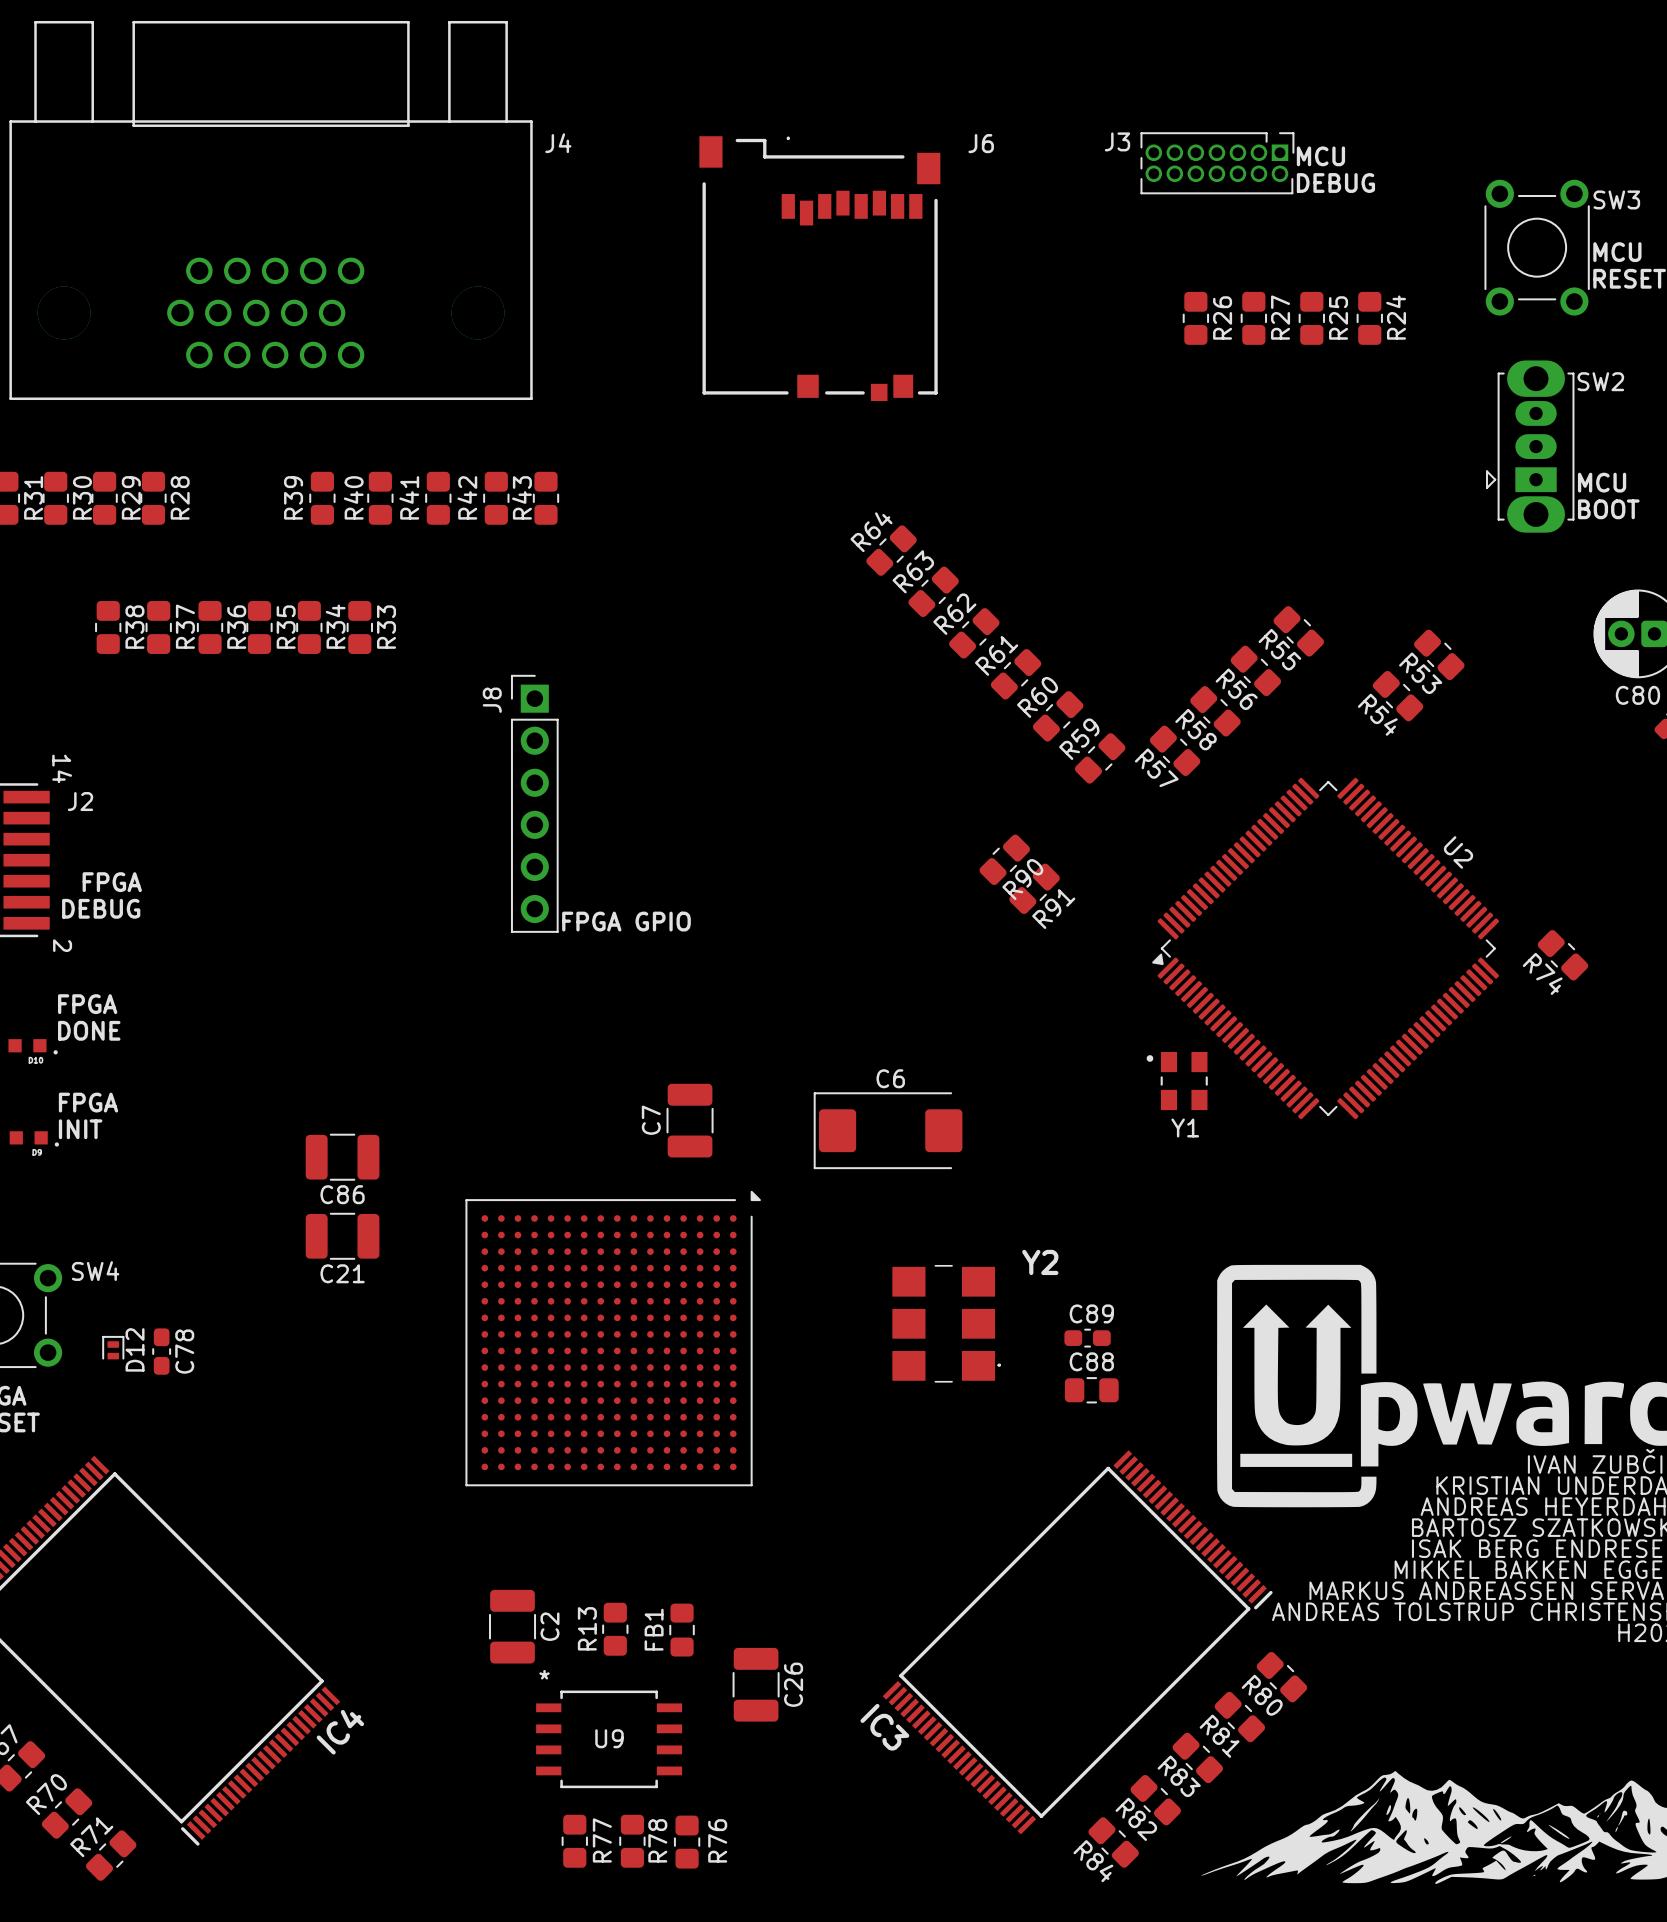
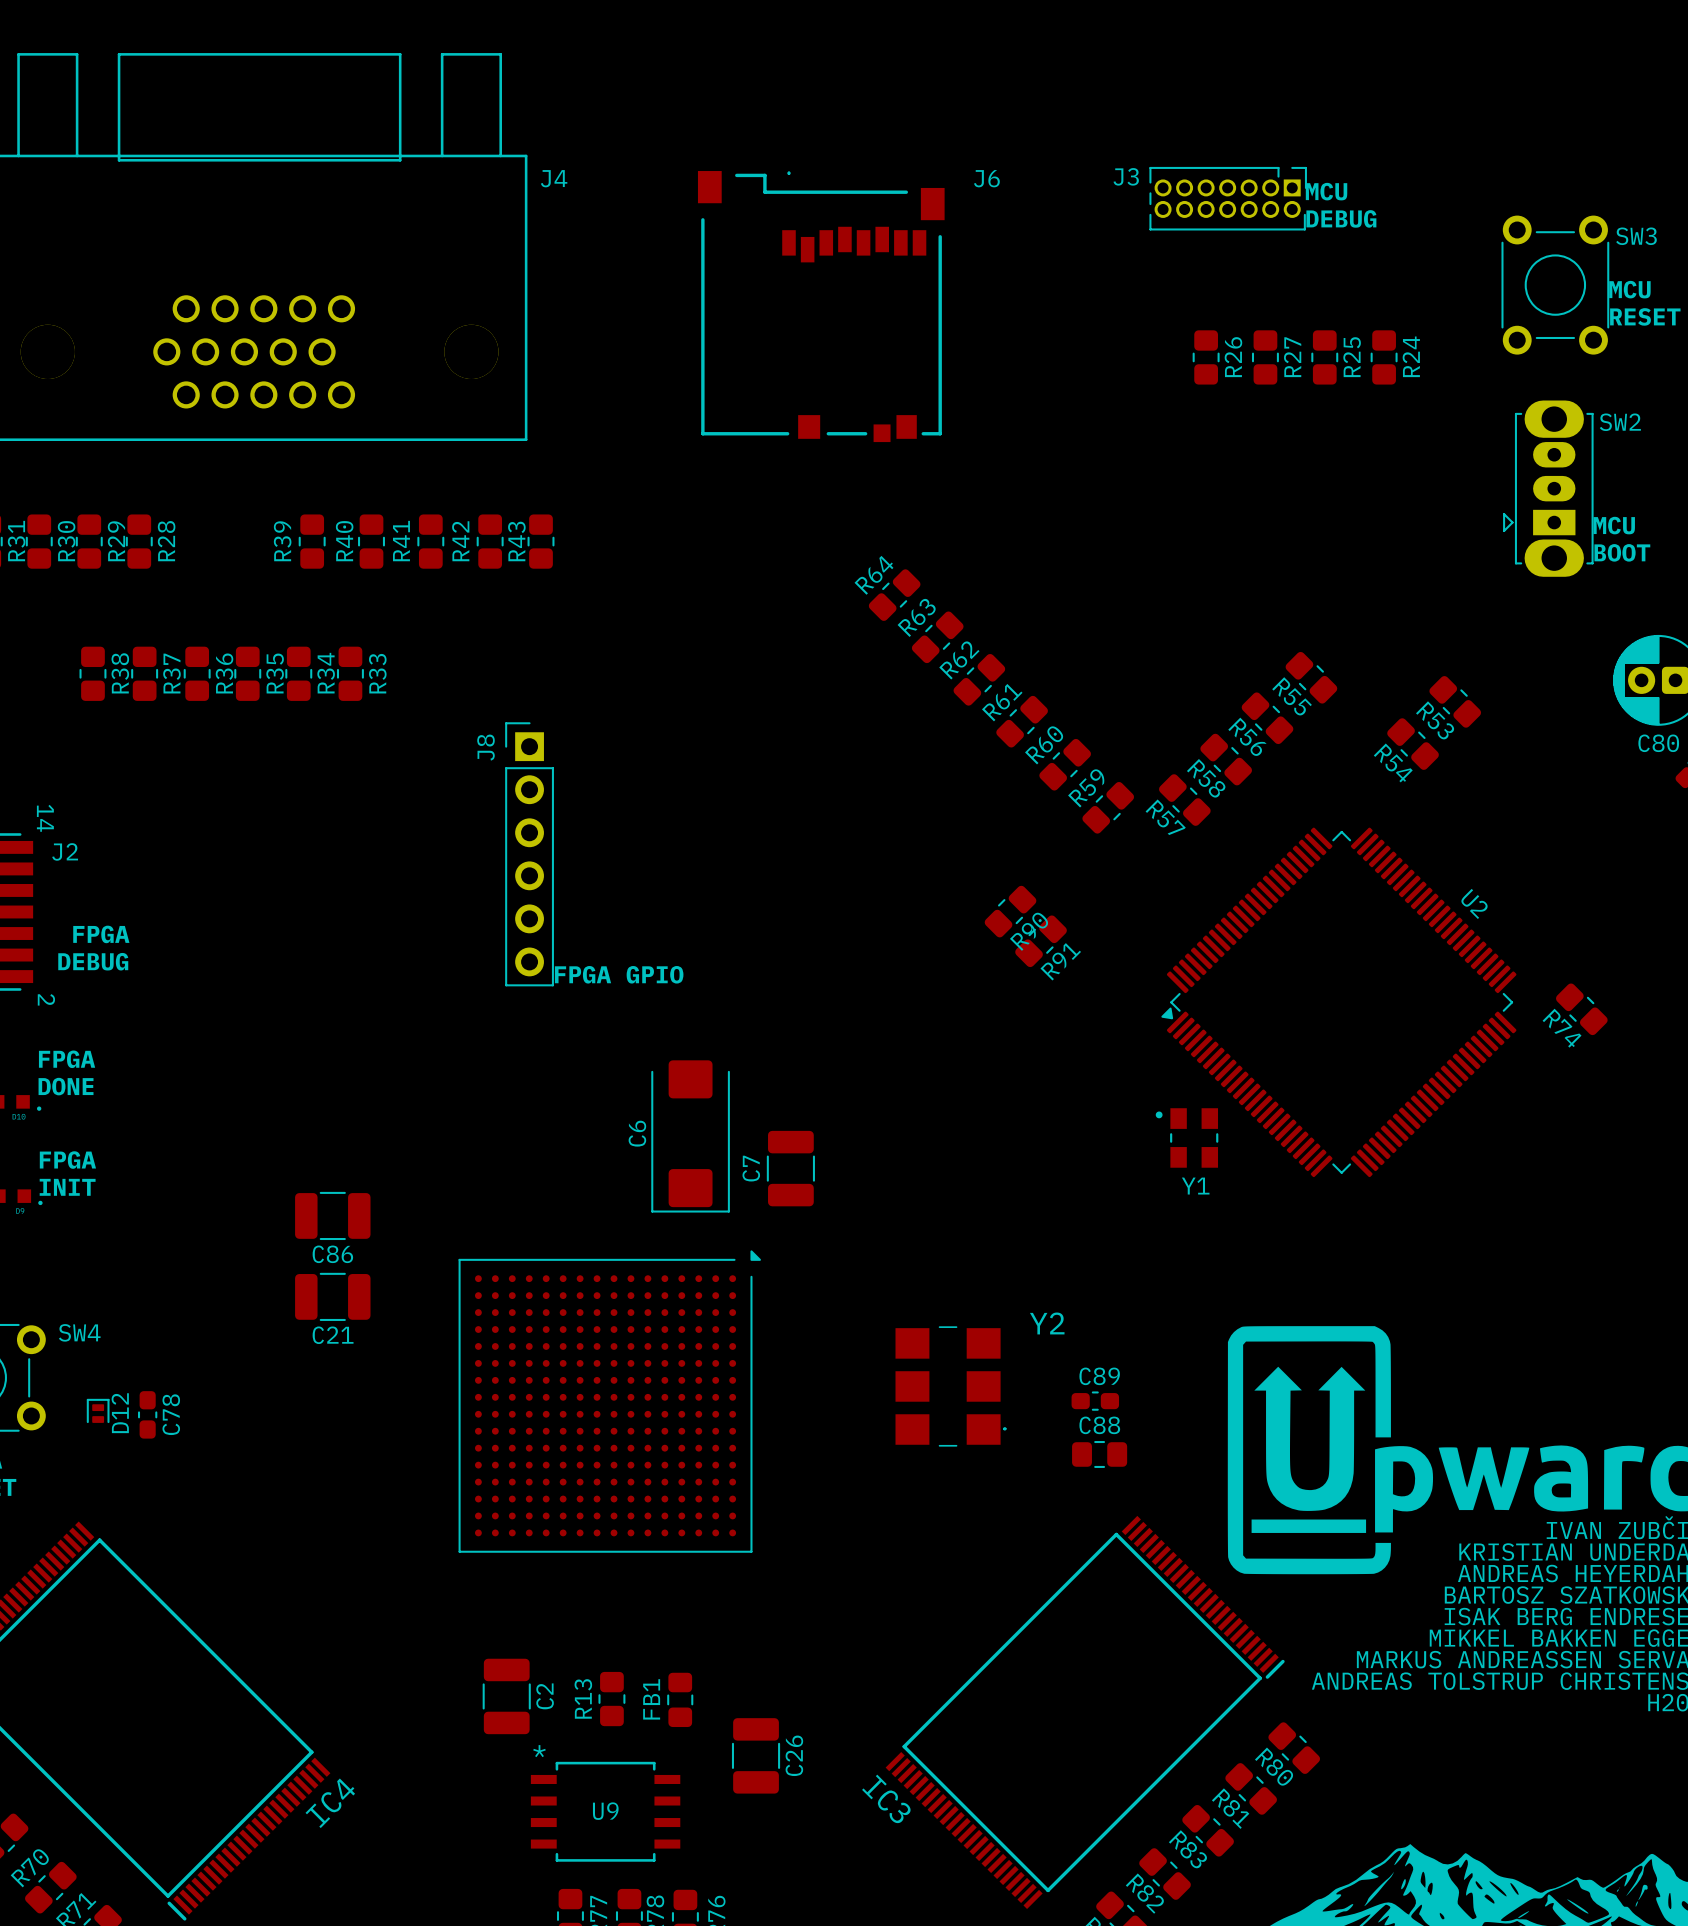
C7 position: (690, 1120) -> (790, 1168)
C6 rotation: 0° (888, 1130) -> 90° counterclockwise (690, 1136)
C6 position: (888, 1130) -> (690, 1136)

